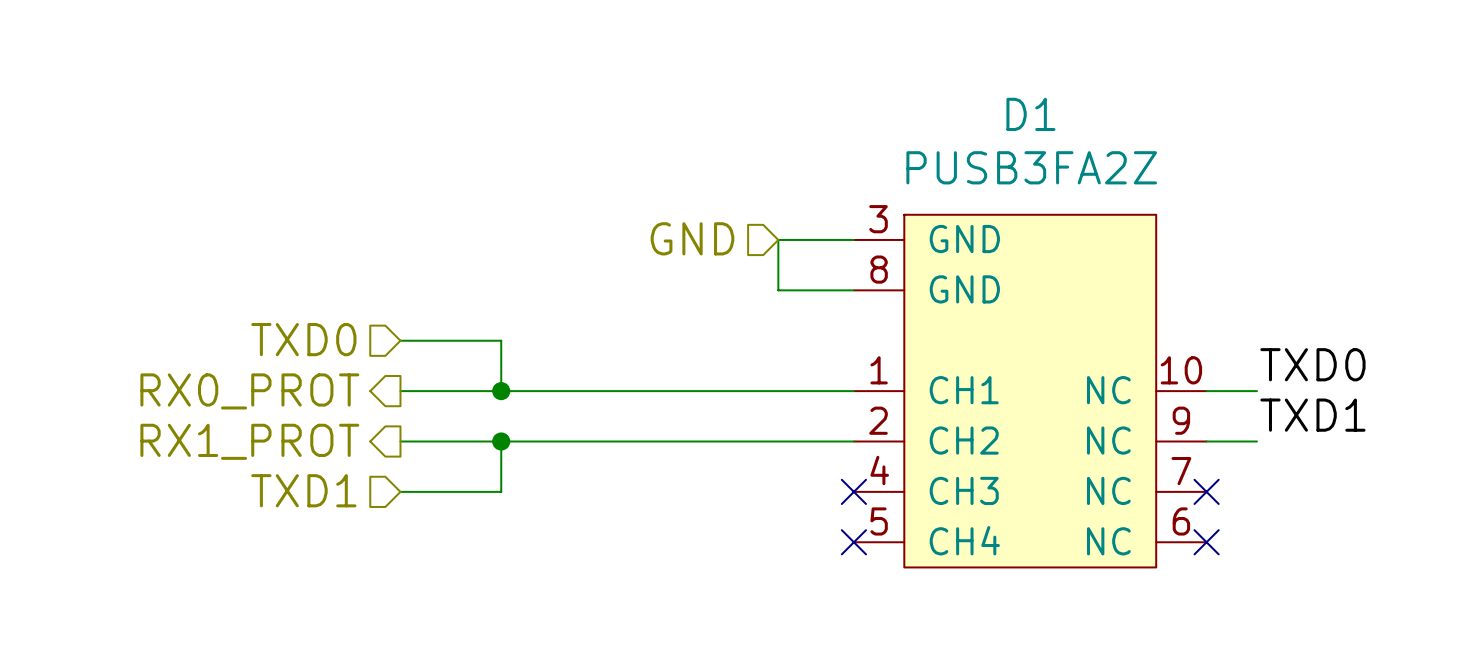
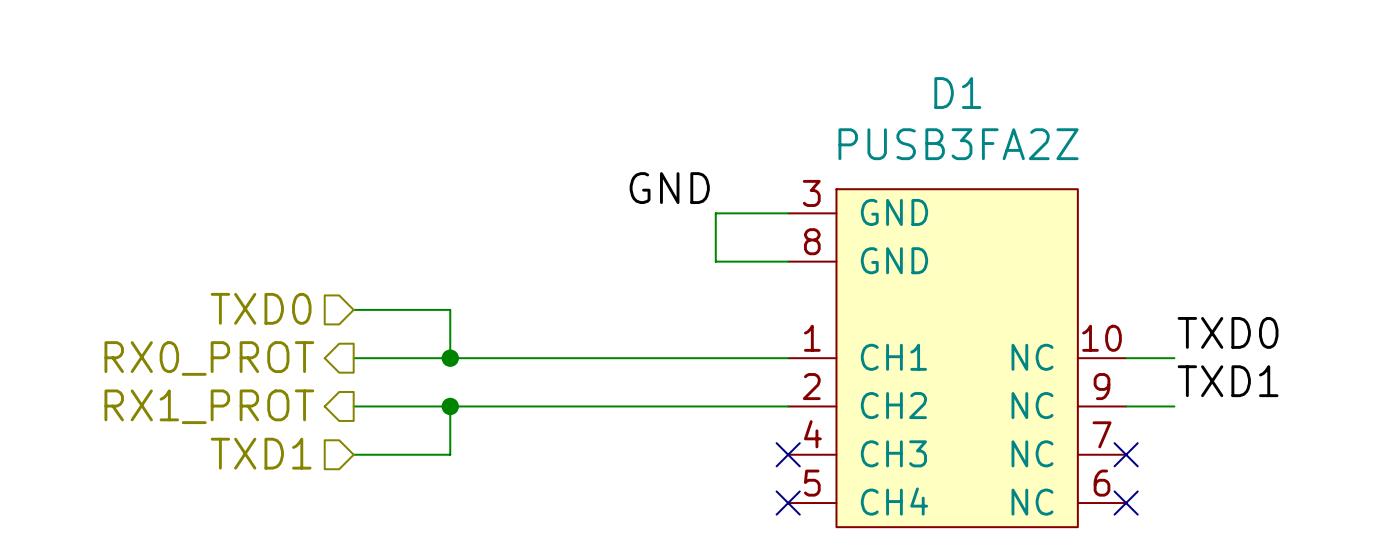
label: none -> GND (669, 188)
hierarchical label: GND (692, 238) -> none

